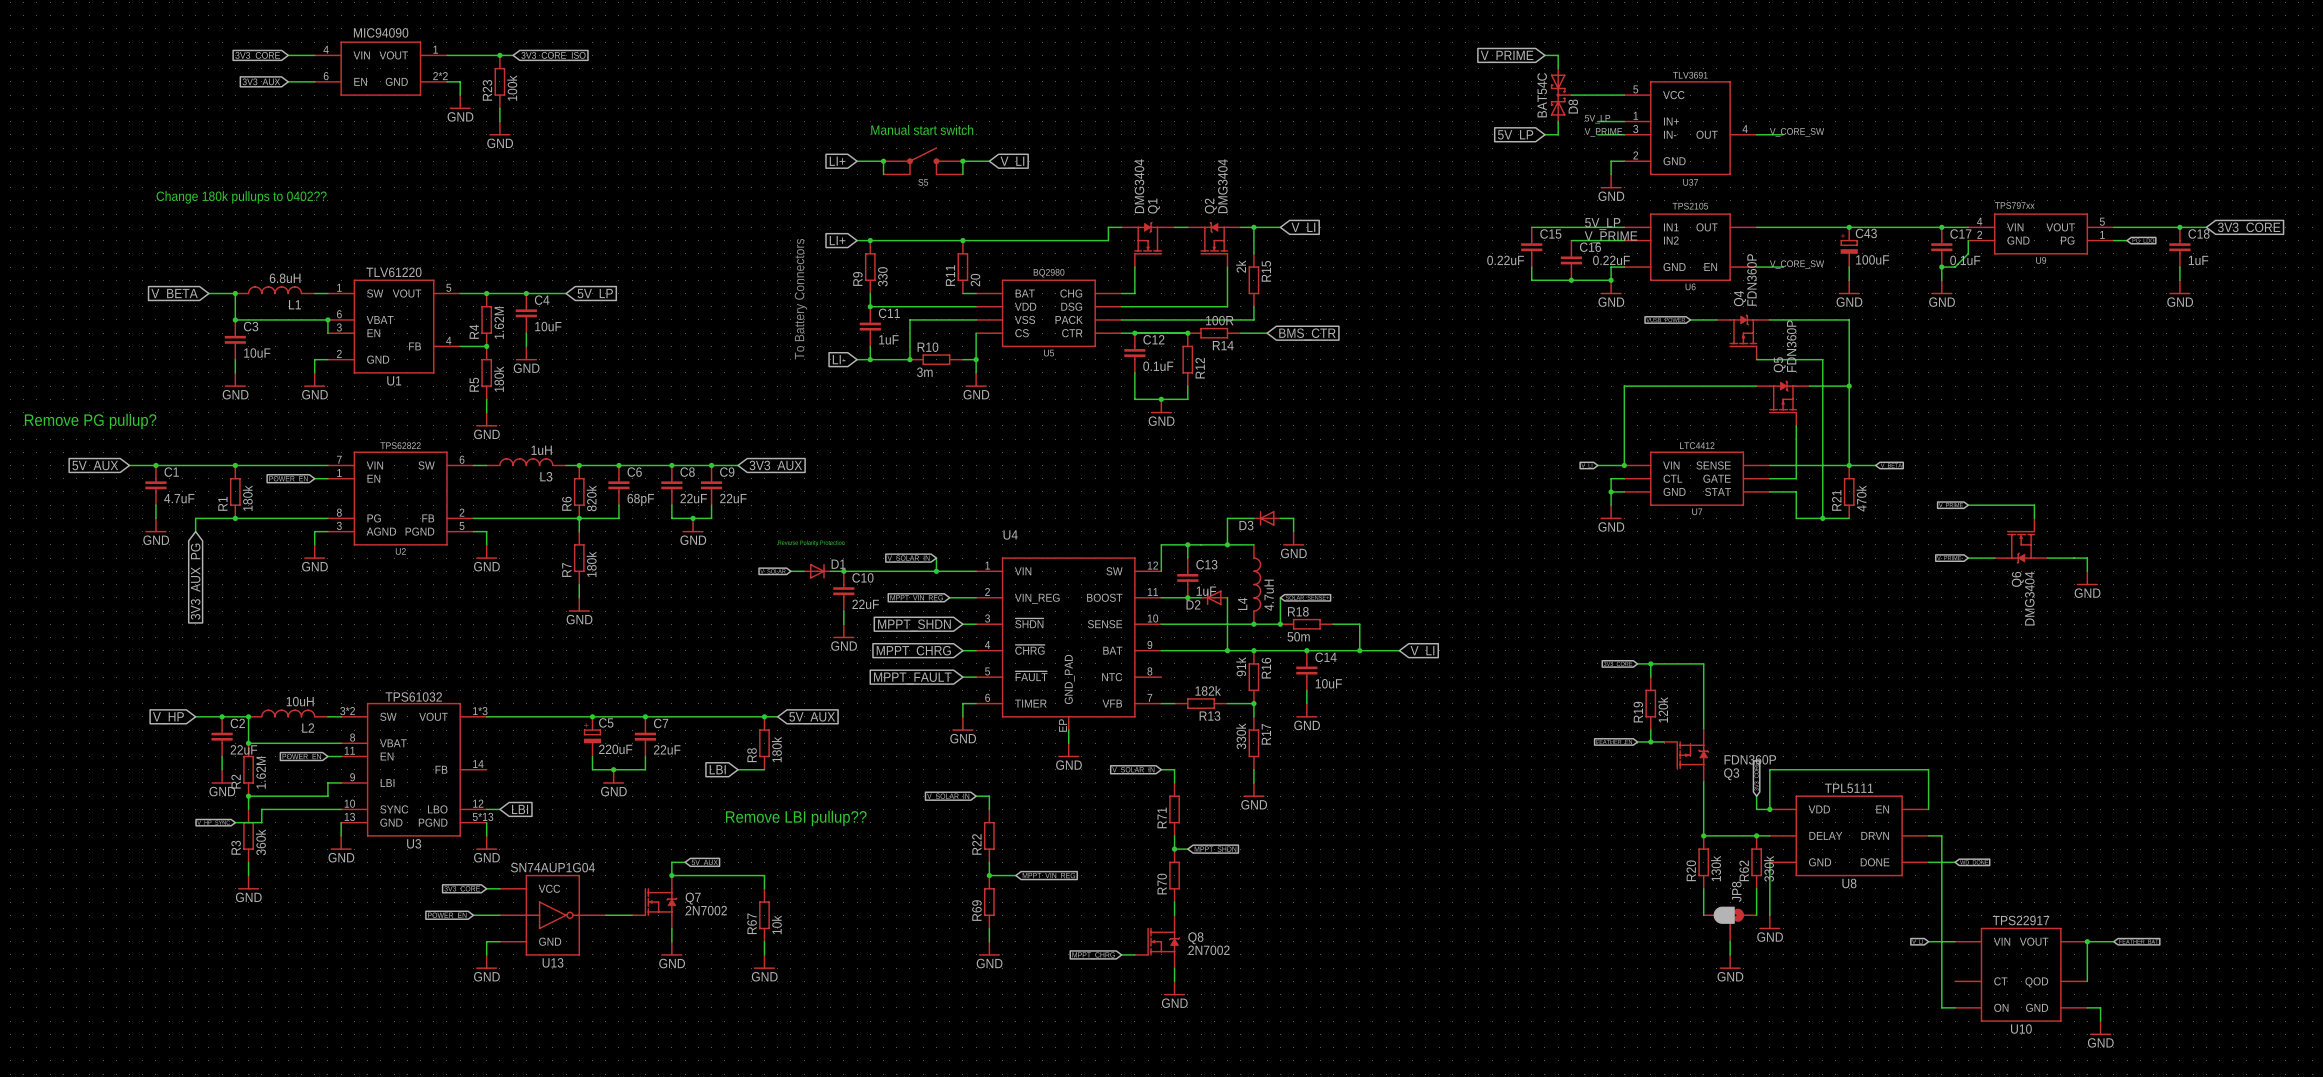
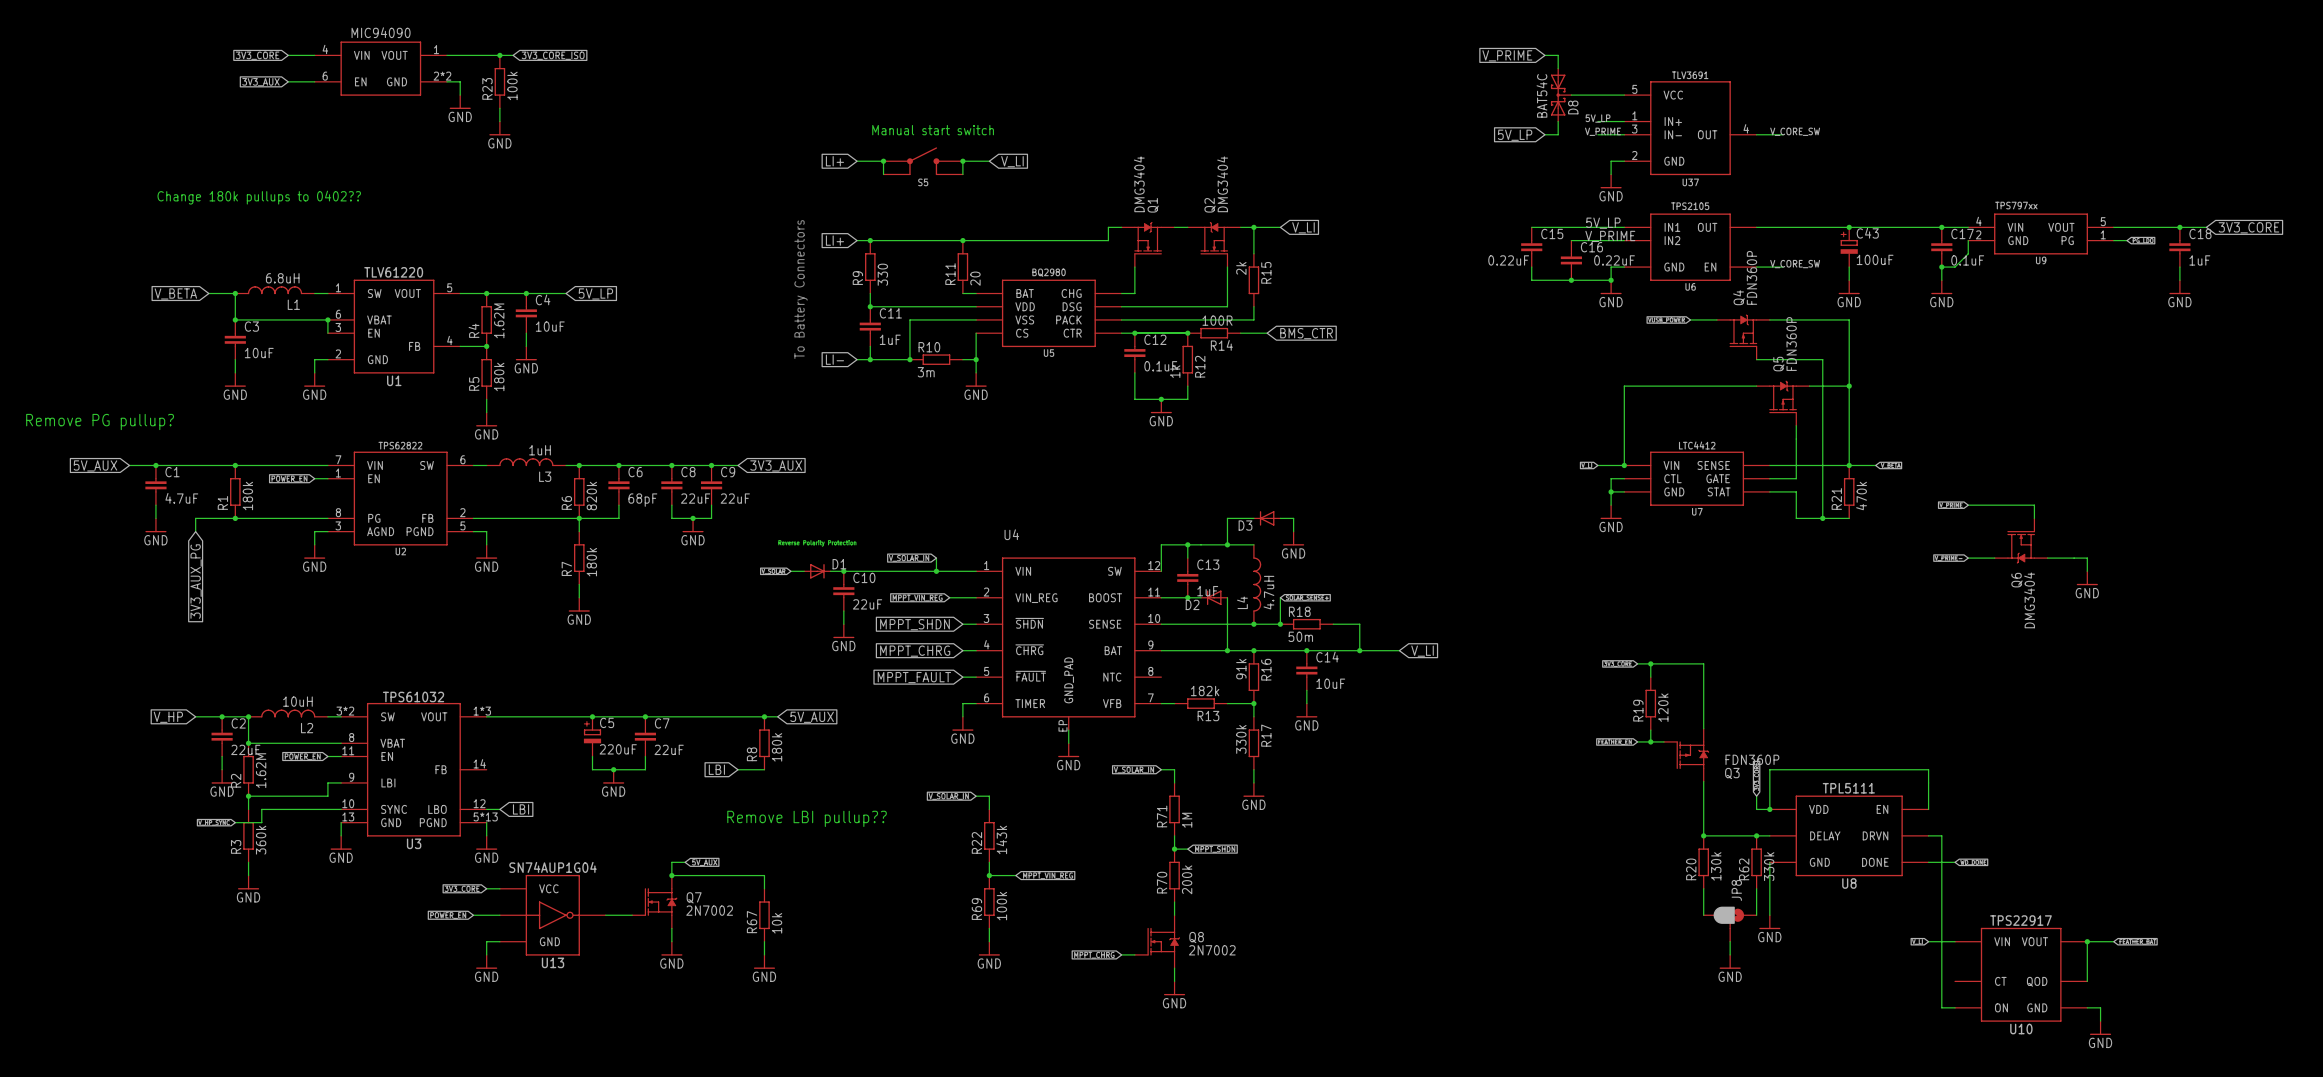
R12 value: none -> 1k (1175, 371)
R71 value: none -> 1M (1187, 820)
R22 value: none -> 143k (1001, 839)
R70 value: none -> 200k (1187, 879)
R69 value: none -> 100k (1001, 906)

